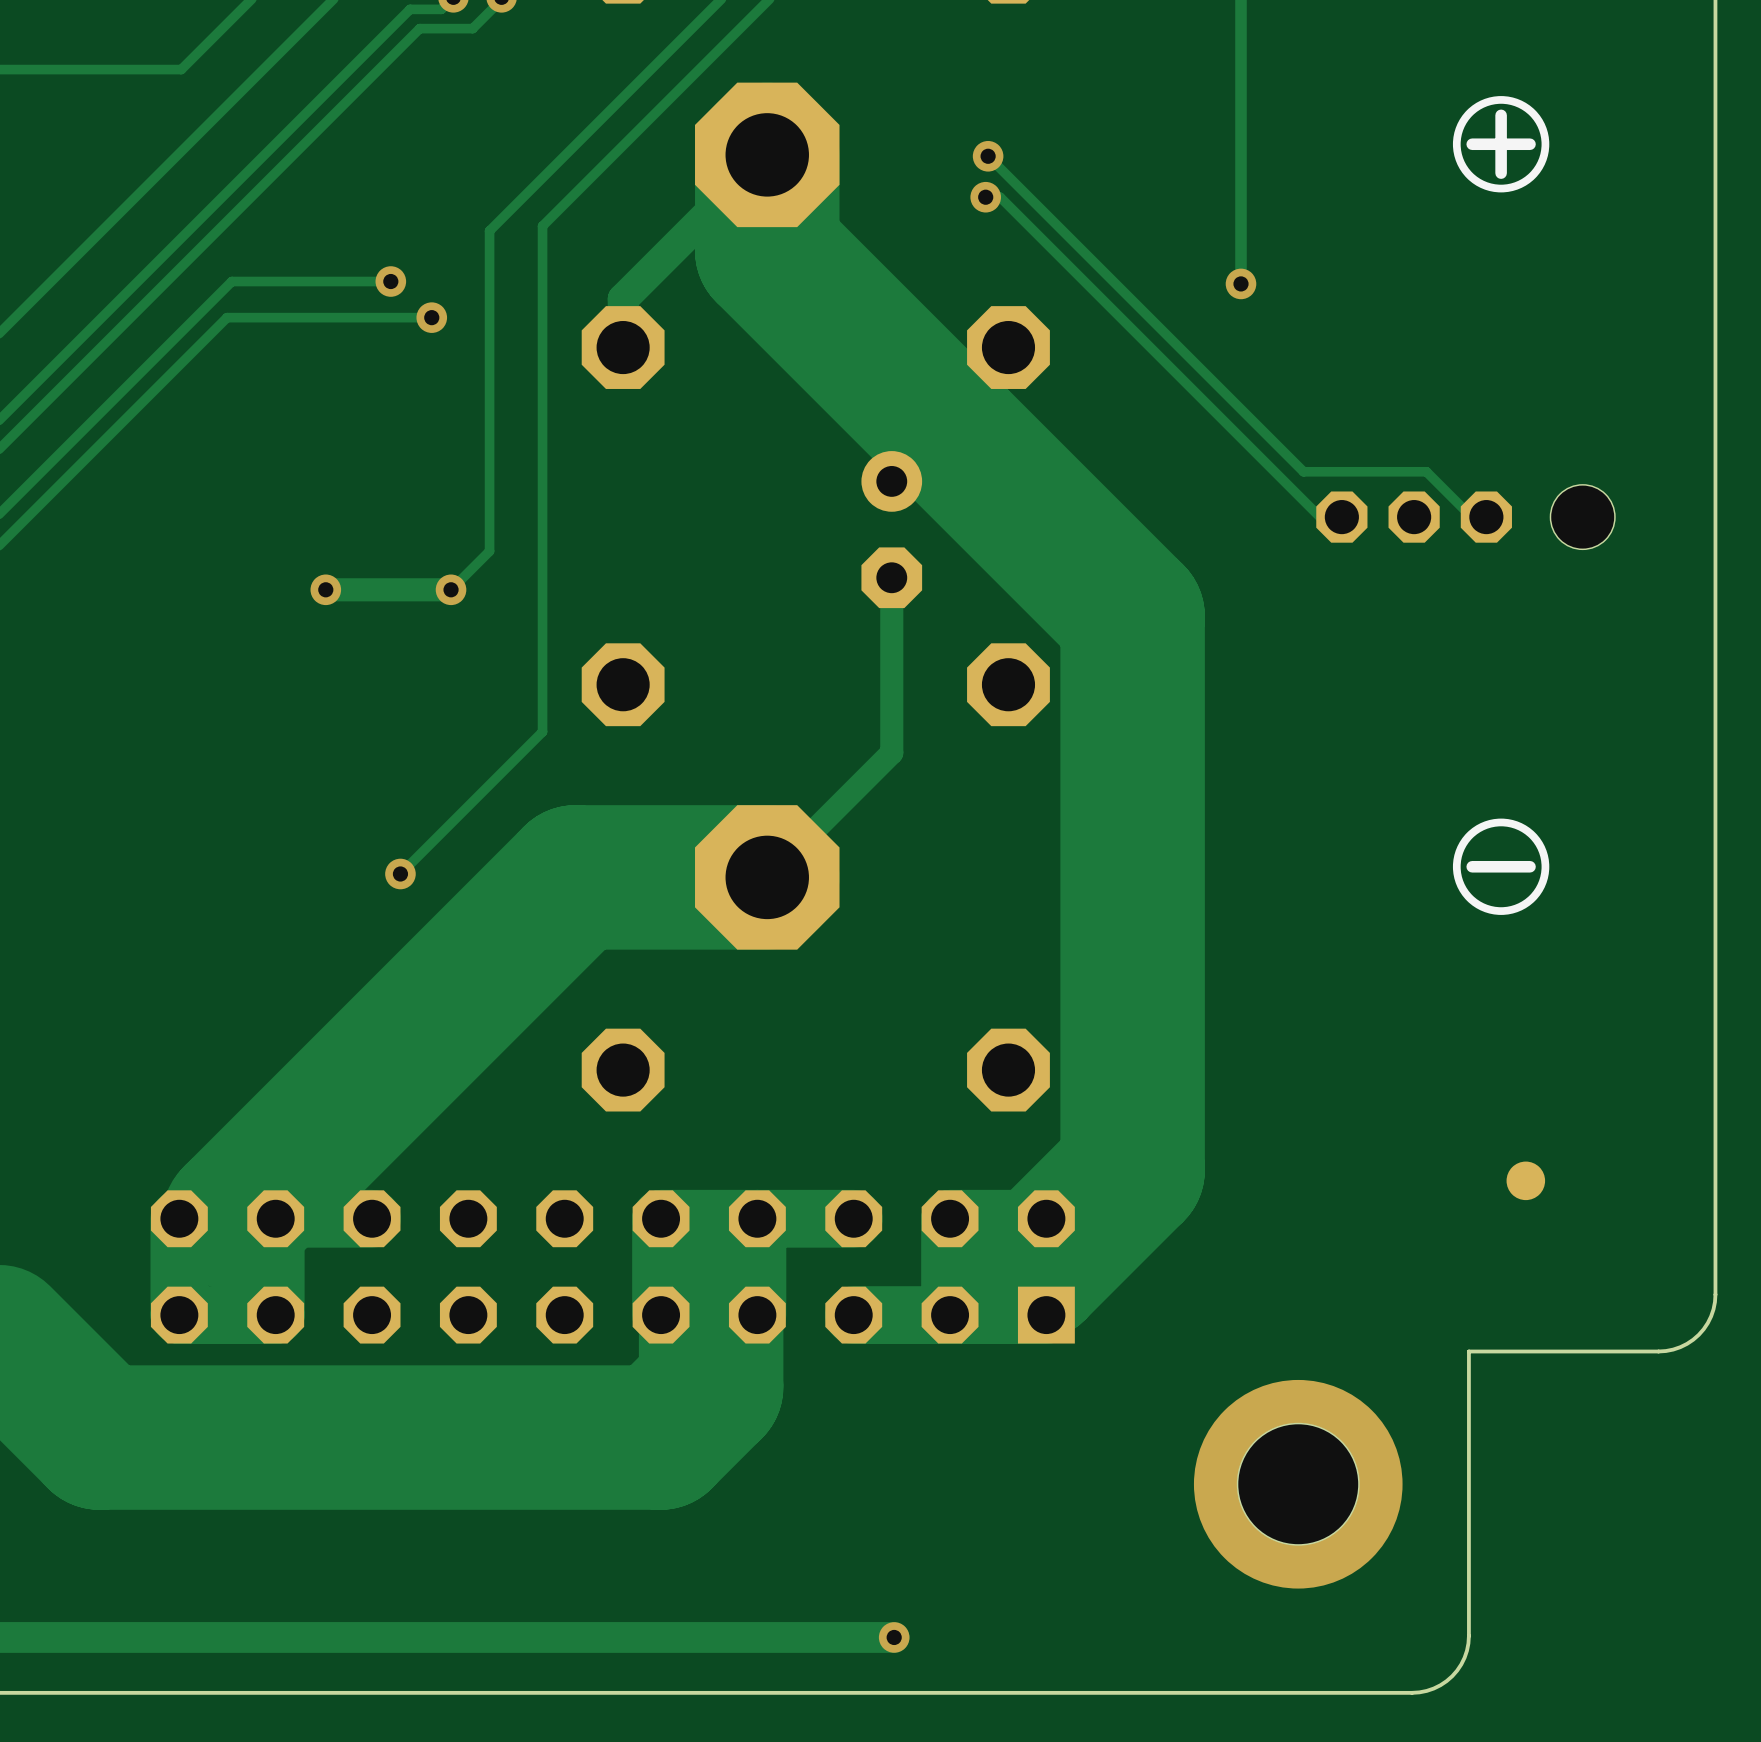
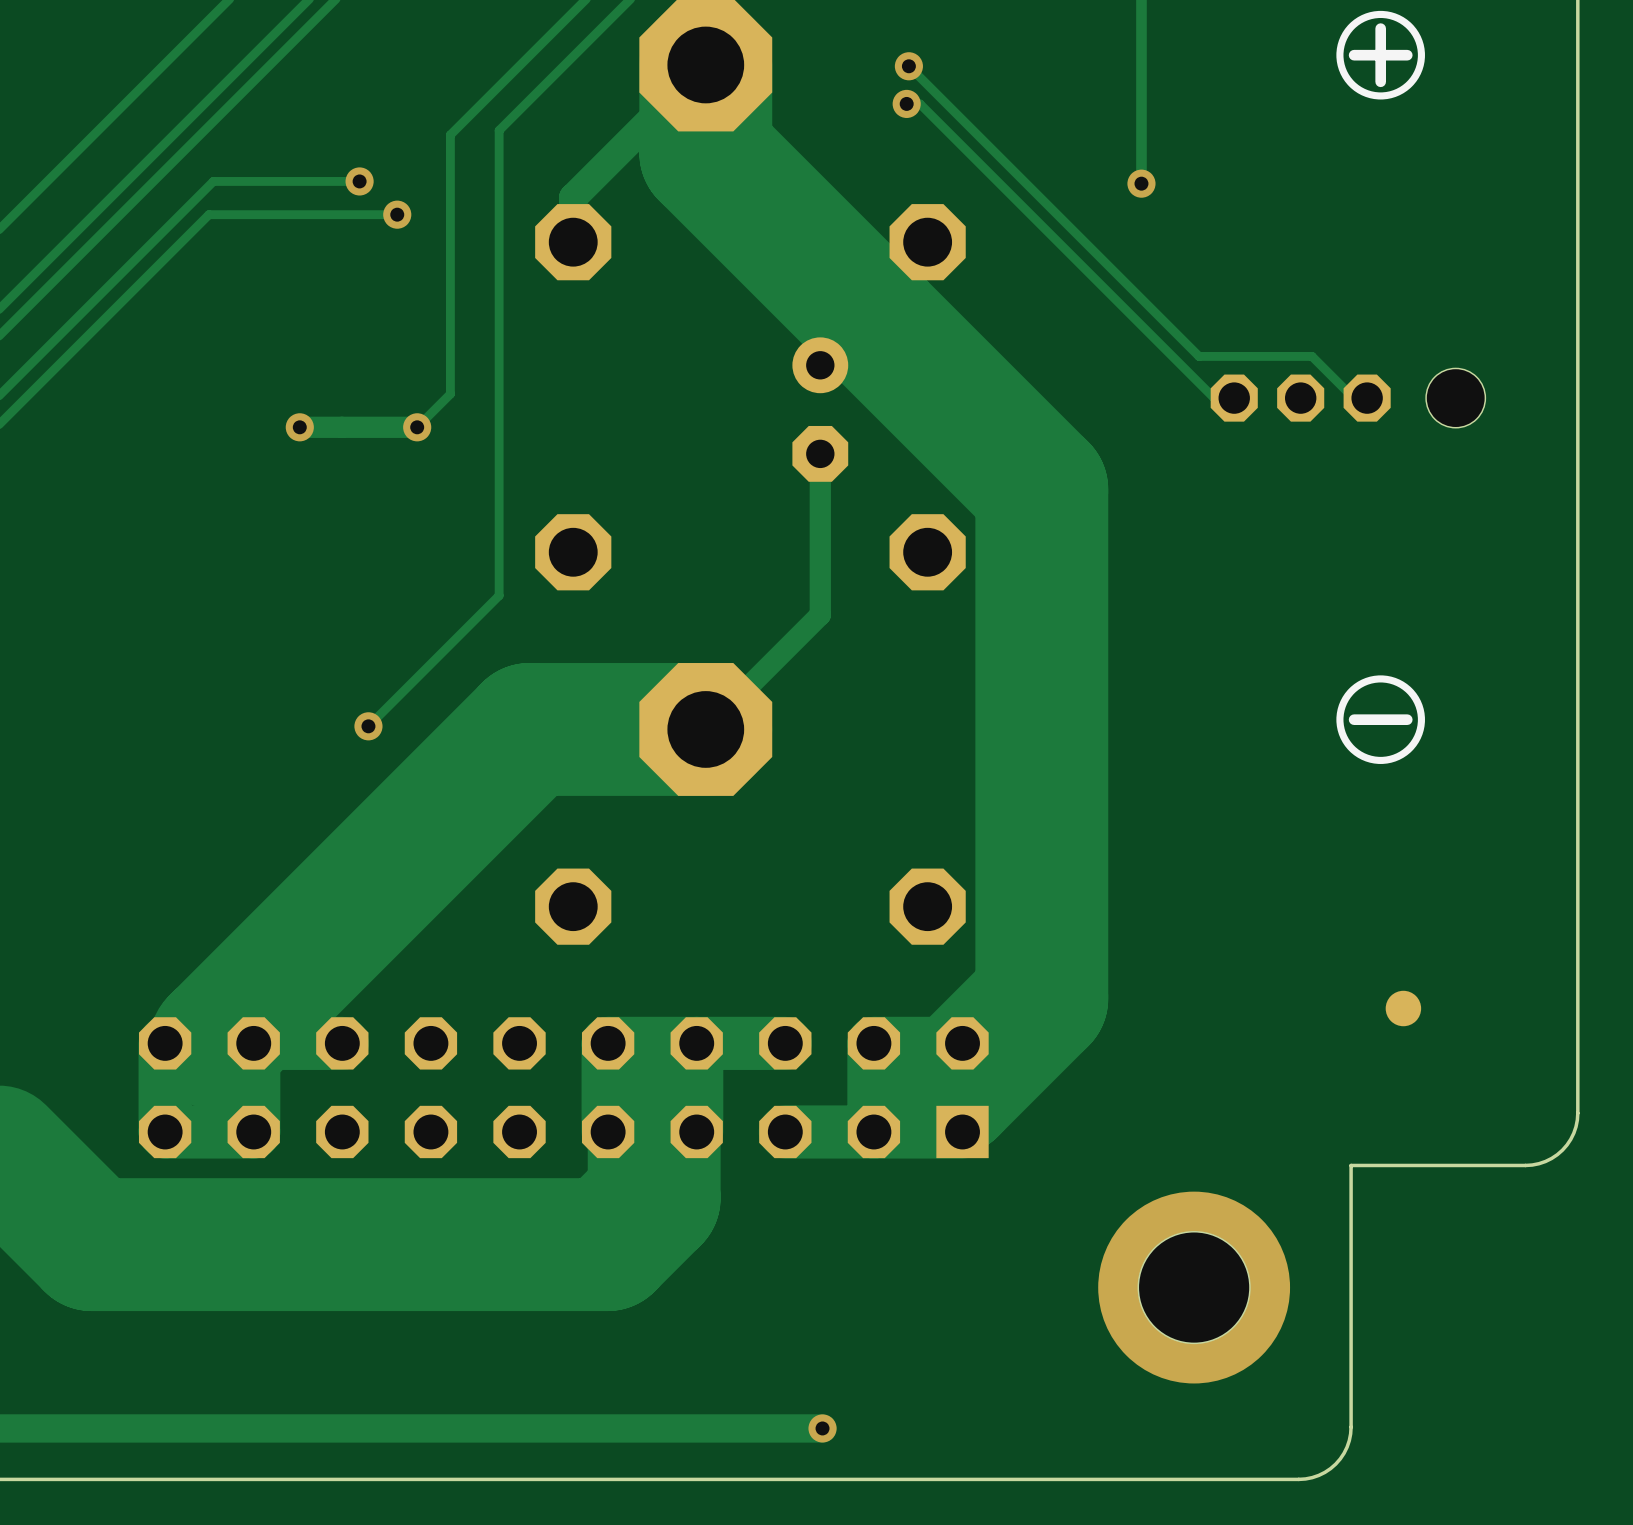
track: (489, 512) (489, 551) (451, 589) (325, 589) -> (450, 394) (417, 427) (299, 427)
via position: (325, 589) -> (299, 427)
via position: (451, 589) -> (417, 427)

